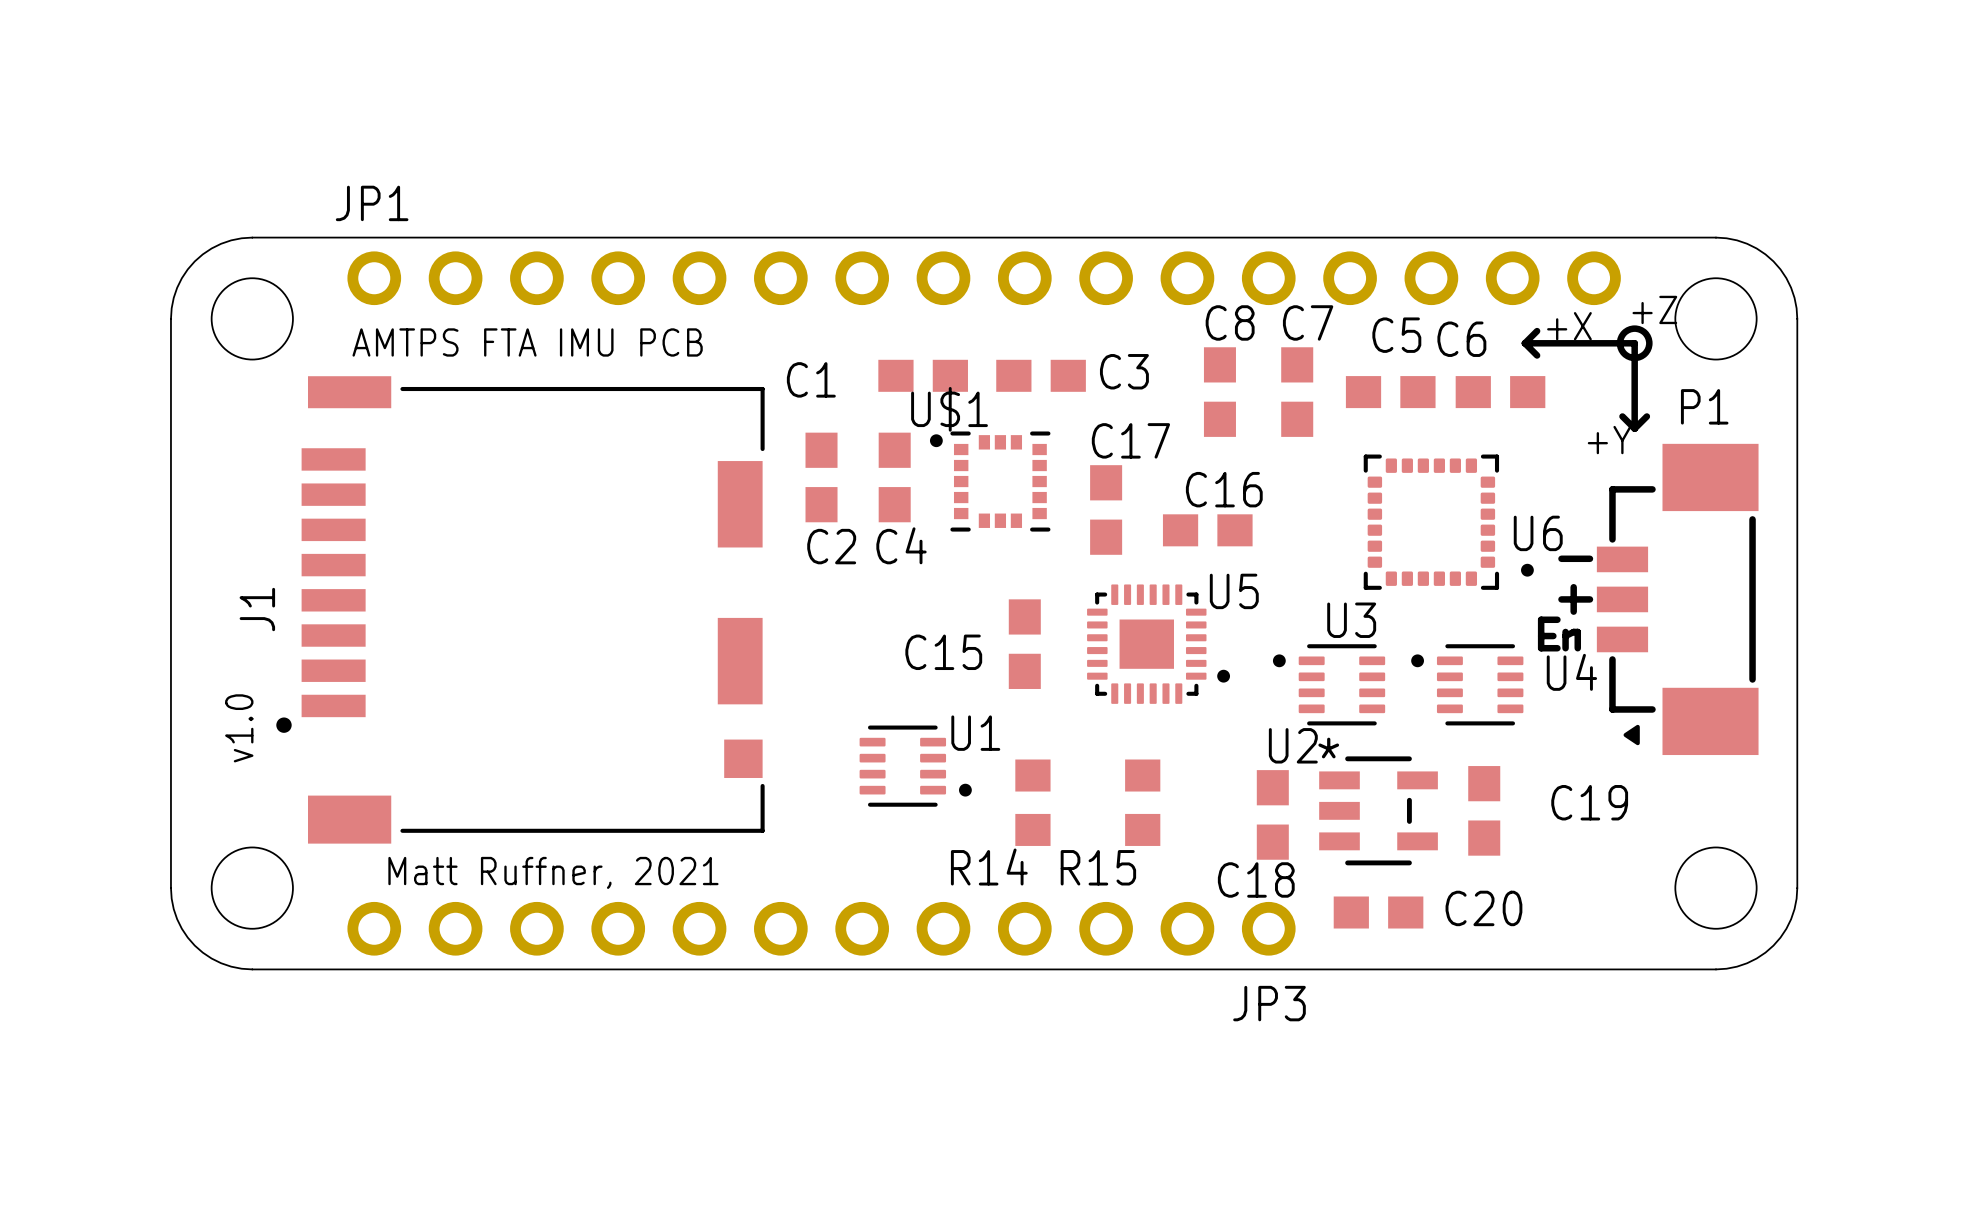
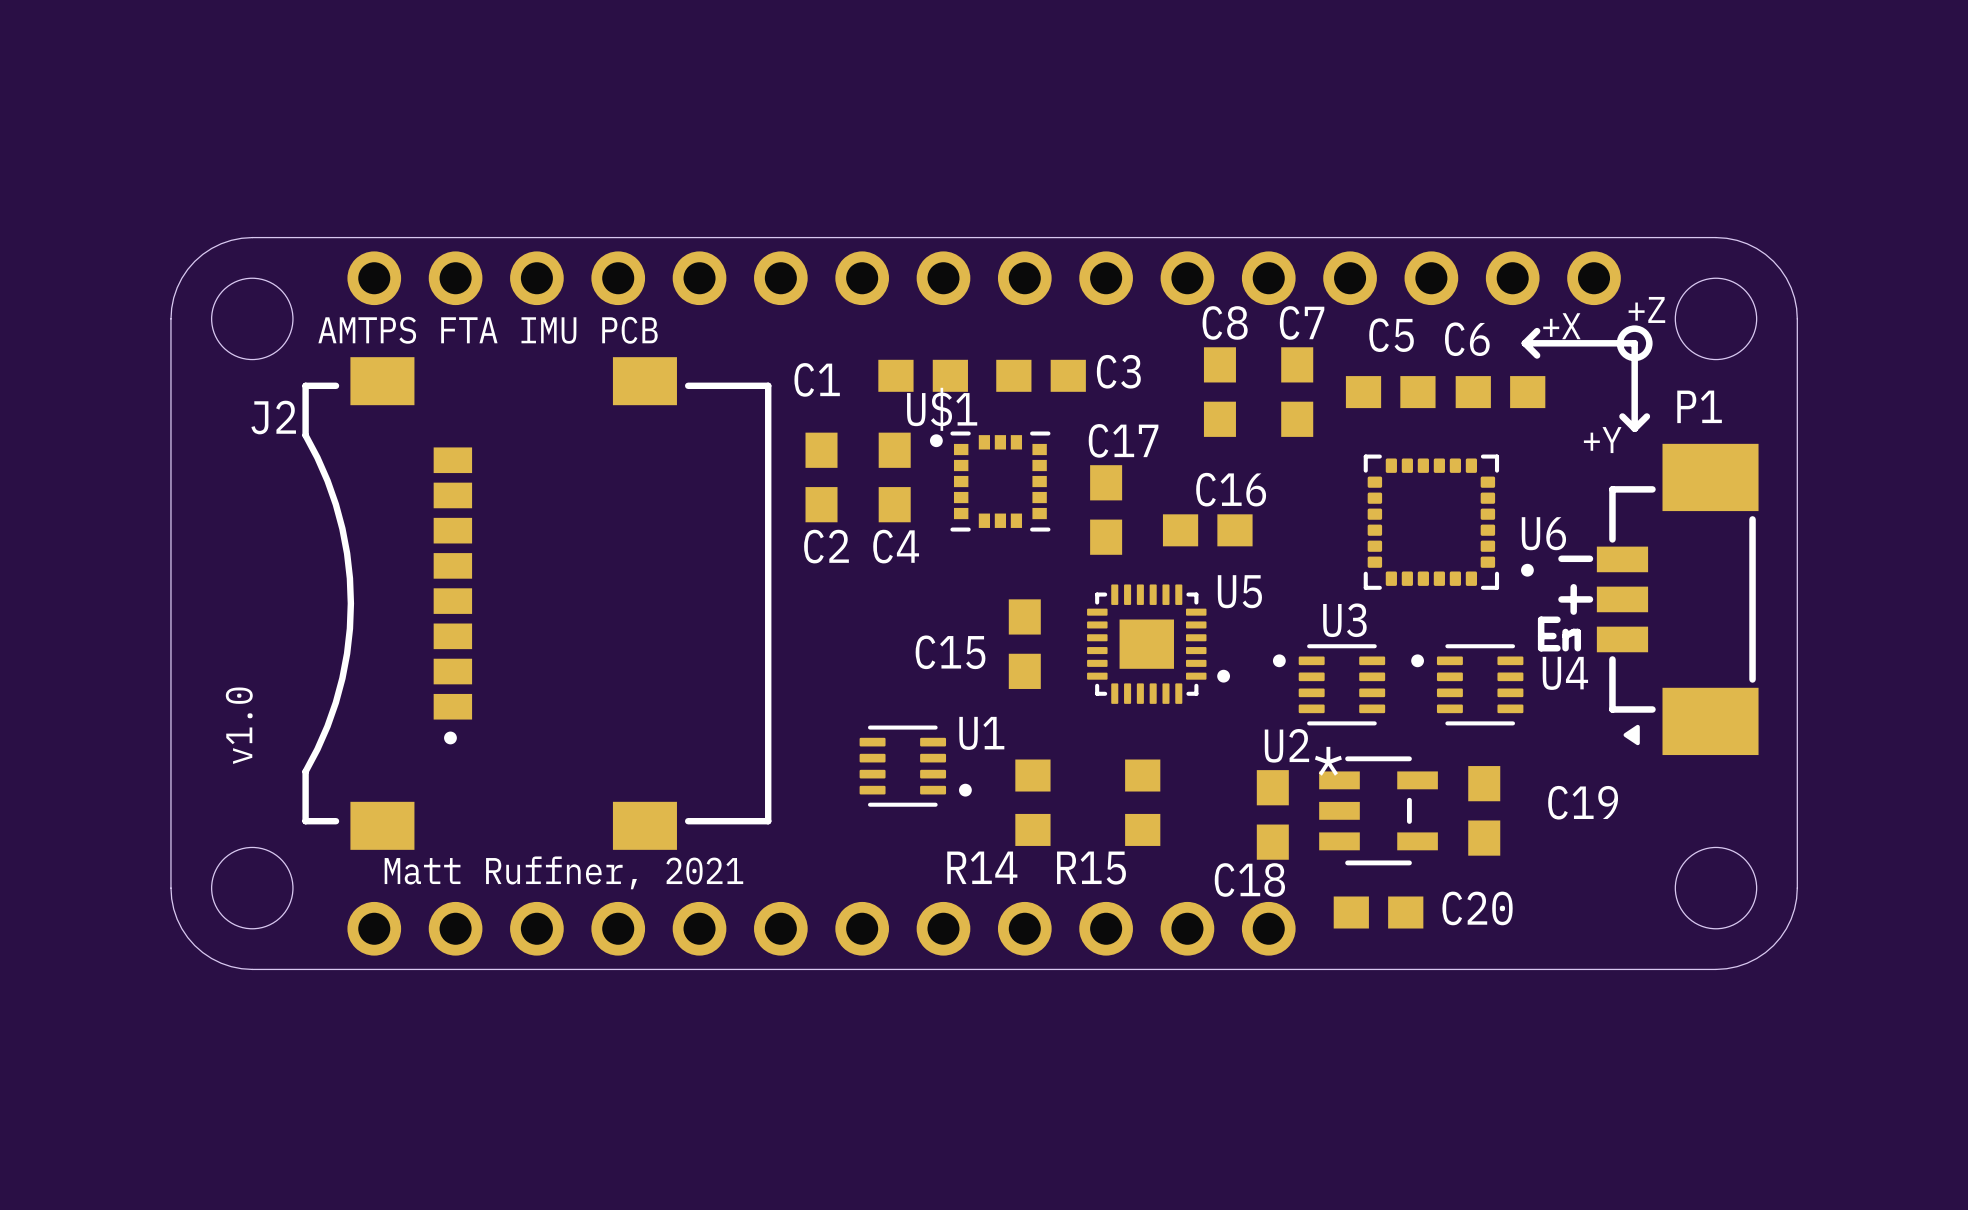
JP1 name: JP1 (372, 203) -> none
text position: AMTPS FTA IMU PCB (527, 342) -> AMTPS FTA IMU PCB (488, 330)
J2: none -> (536, 603)
J1: (520, 609) -> none
JP3 name: JP3 (1269, 1003) -> none

